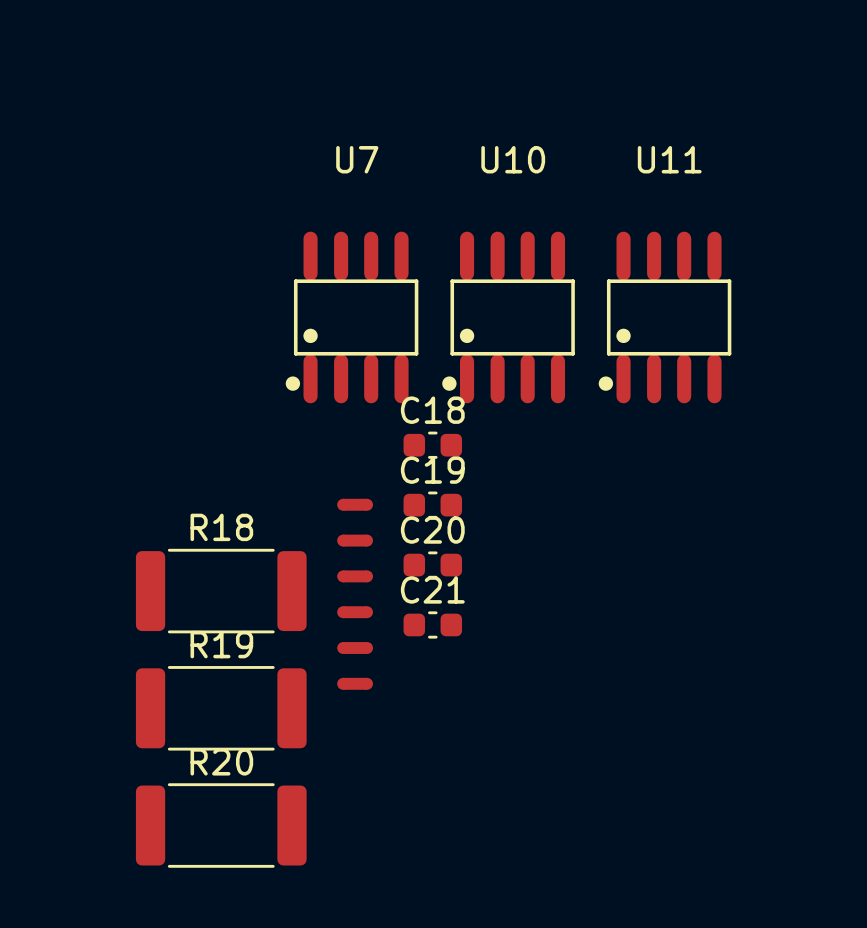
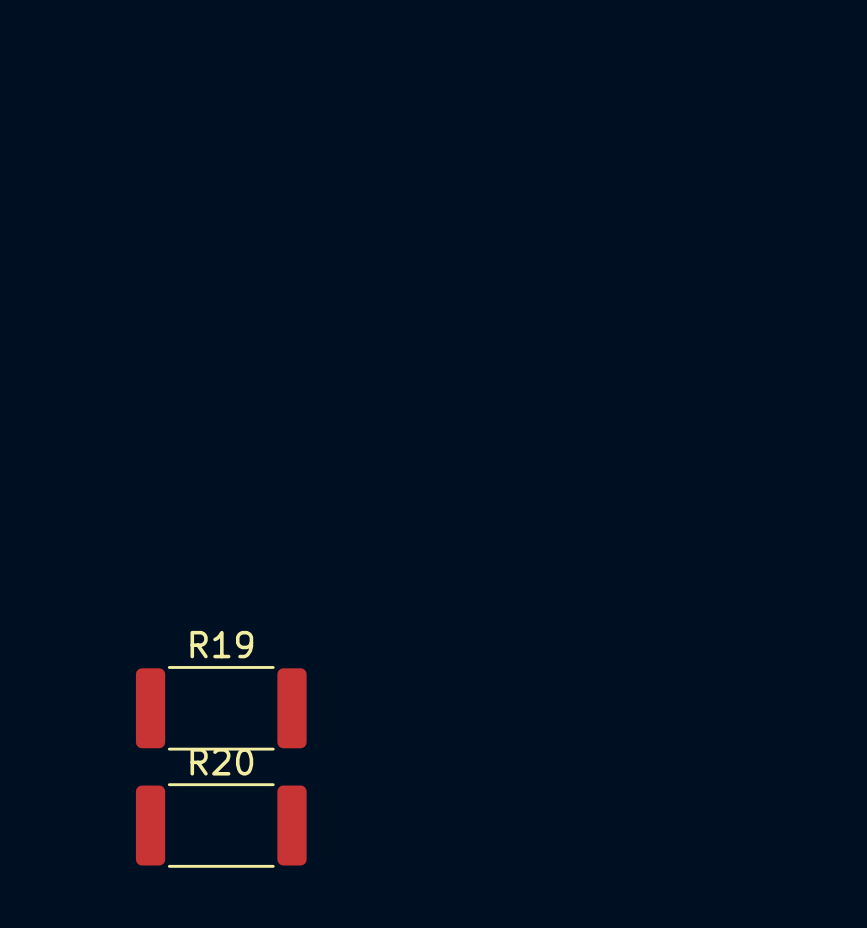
U7: (352, 317) -> none
U10: (508, 317) -> none
U11: (665, 317) -> none
C18: (432, 445) -> none
part: (355, 504) -> none
C19: (432, 505) -> none
part: (355, 540) -> none
C20: (432, 565) -> none
part: (355, 576) -> none
R18: (221, 591) -> none
part: (355, 612) -> none
C21: (432, 624) -> none
part: (355, 648) -> none
part: (355, 683) -> none

